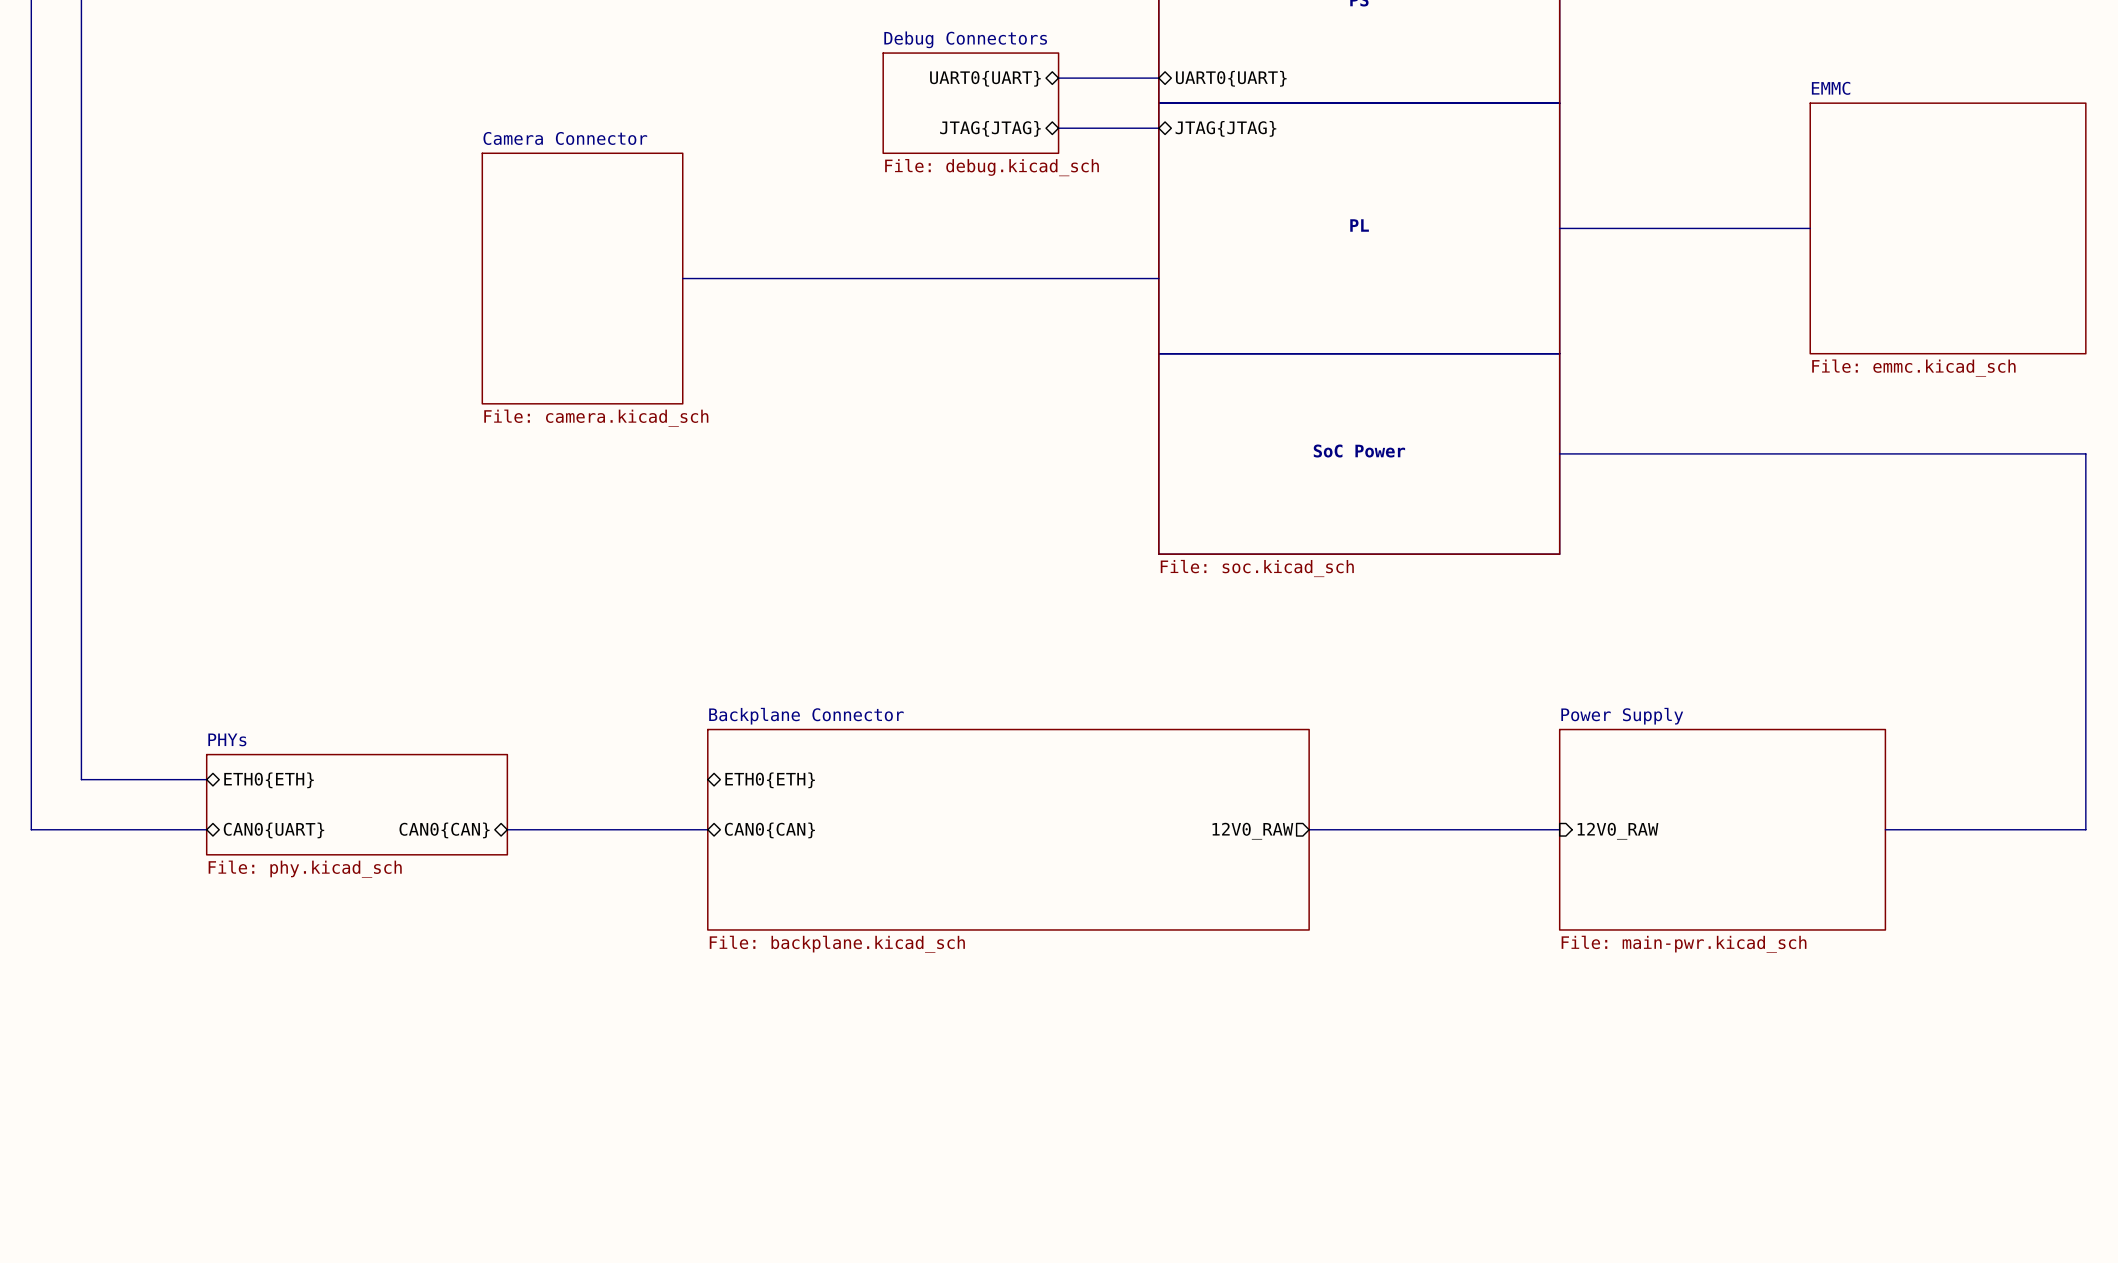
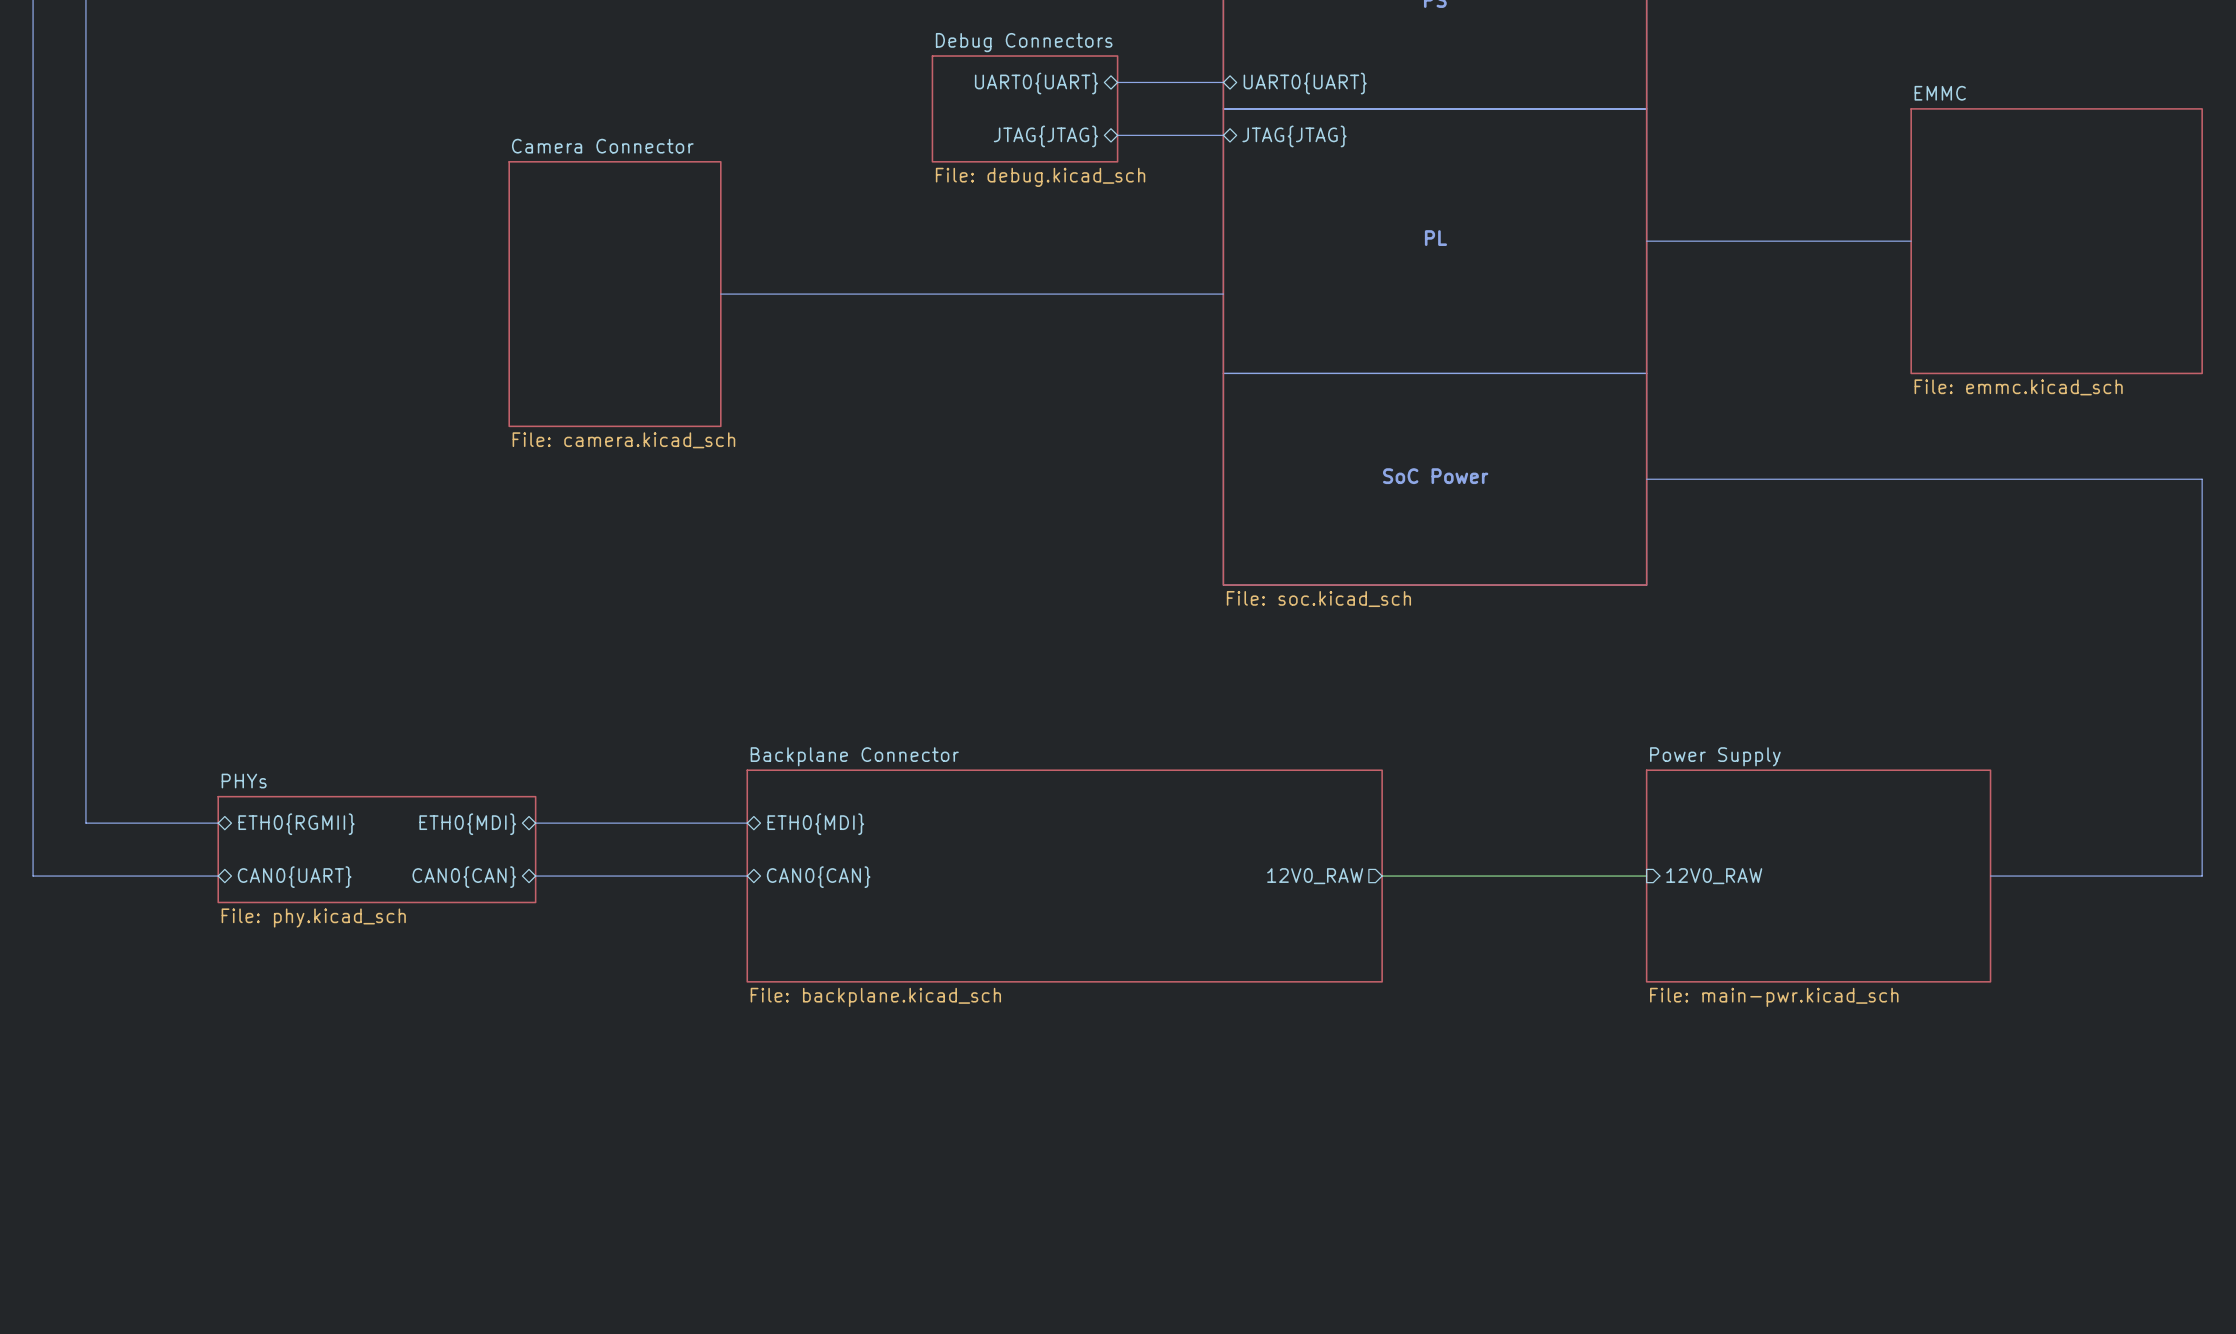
bus: none -> (535, 823) (747, 823)
sheet pin: ETH0{ETH} (269, 780) -> ETH0{RGMII} (296, 824)
sheet pin: none -> ETH0{MDI} (467, 824)
sheet pin: ETH0{ETH} (770, 780) -> ETH0{MDI} (815, 824)

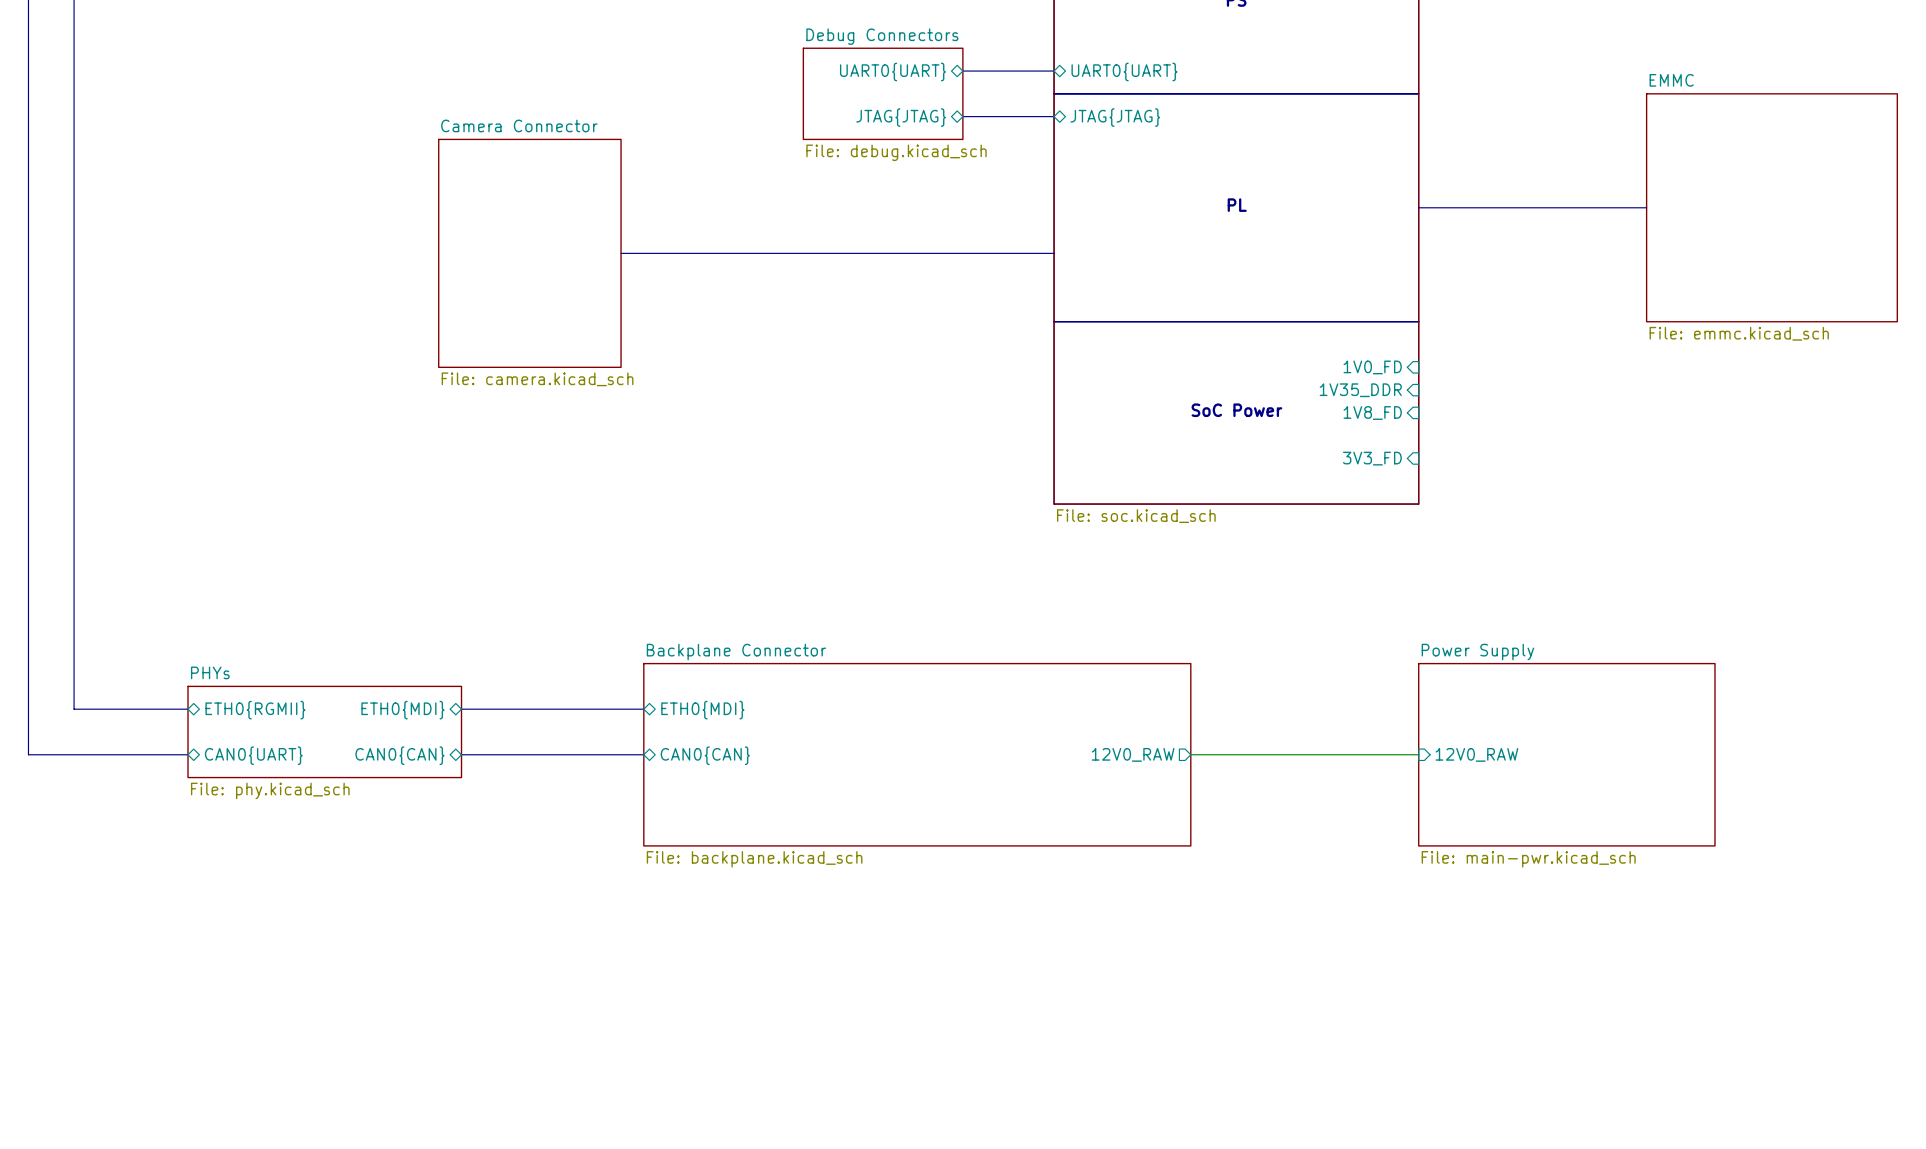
sheet pin: none -> 1V0_FD (1372, 367)
sheet pin: none -> 1V35_DDR (1360, 390)
sheet pin: none -> 1V8_FD (1372, 413)
bus: (1646, 479) (2202, 479) (2202, 876) (1990, 876) -> none
sheet pin: none -> 3V3_FD (1372, 458)

